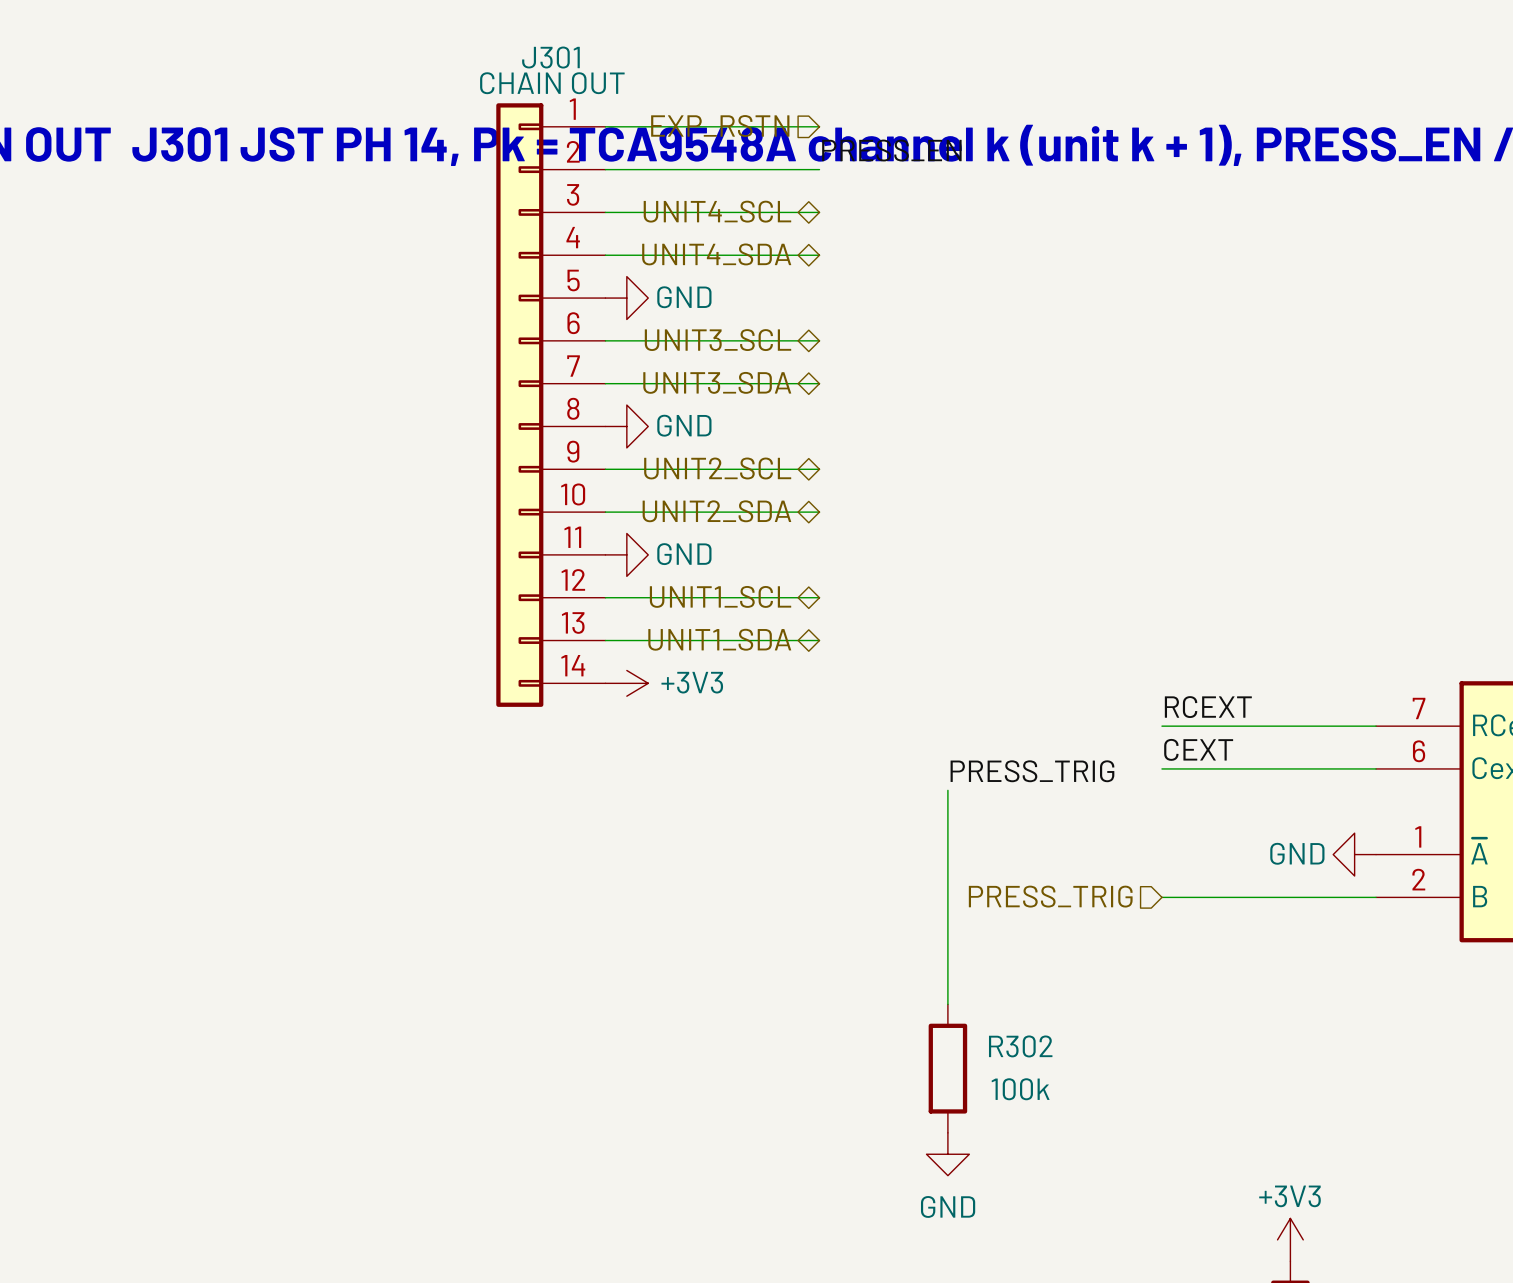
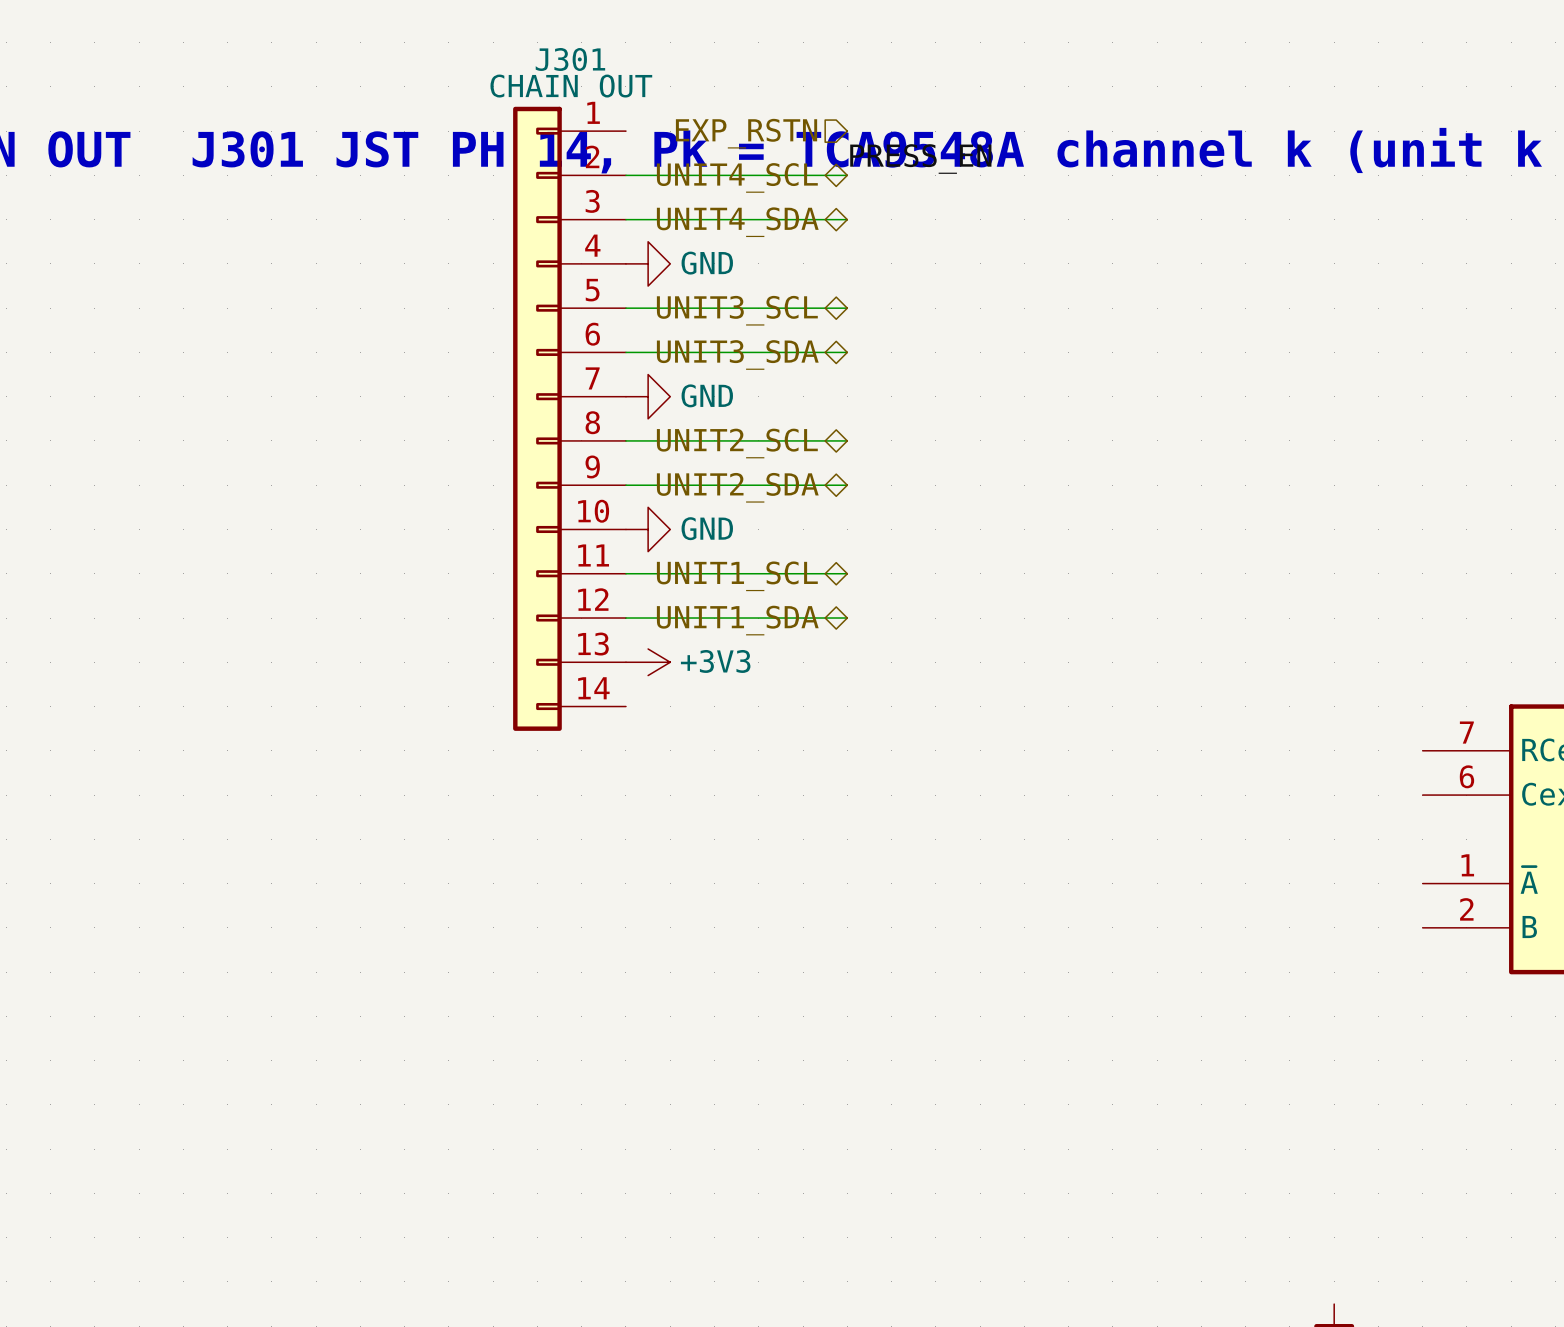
wire: (605, 126) (819, 126) -> none
hierarchical label: none -> UNIT4_SCL (737, 177)
hierarchical label: UNIT4_SCL (717, 211) -> UNIT4_SDA (737, 222)
hierarchical label: UNIT4_SDA (716, 254) -> UNIT3_SCL (737, 310)
wire: (605, 255) (819, 255) -> (625, 308) (847, 308)
power symbol: none -> GND (648, 263)
power symbol: GND (626, 298) -> none
hierarchical label: UNIT3_SCL (718, 340) -> UNIT3_SDA (737, 354)
hierarchical label: UNIT3_SDA (717, 382) -> UNIT2_SCL (737, 443)
wire: (605, 383) (819, 383) -> (625, 440) (847, 440)
power symbol: none -> GND (648, 396)
power symbol: GND (626, 426) -> none
hierarchical label: UNIT2_SCL (717, 468) -> UNIT2_SDA (737, 487)
hierarchical label: UNIT2_SDA (716, 511) -> UNIT1_SCL (737, 576)
wire: (605, 512) (819, 512) -> (625, 573) (847, 573)
power symbol: none -> GND (648, 529)
power symbol: GND (626, 554) -> none
hierarchical label: UNIT1_SCL (720, 596) -> UNIT1_SDA (737, 620)
hierarchical label: UNIT1_SDA (719, 639) -> none
wire: (605, 640) (819, 640) -> none
power symbol position: +3V3 (626, 683) -> +3V3 (648, 662)
label: RCEXT (1208, 707) -> none
wire: (1161, 726) (1376, 726) -> none
label: CEXT (1198, 749) -> none
wire: (1161, 768) (1376, 768) -> none
label: PRESS_TRIG (1032, 771) -> none
wire: (947, 790) (947, 1004) -> none
power symbol: GND (1354, 854) -> none
hierarchical label: PRESS_TRIG (1050, 896) -> none
wire: (1161, 897) (1376, 897) -> none
R302: 100k (947, 1068) -> none
power symbol: GND (947, 1154) -> none
power symbol: +3V3 (1290, 1239) -> none

